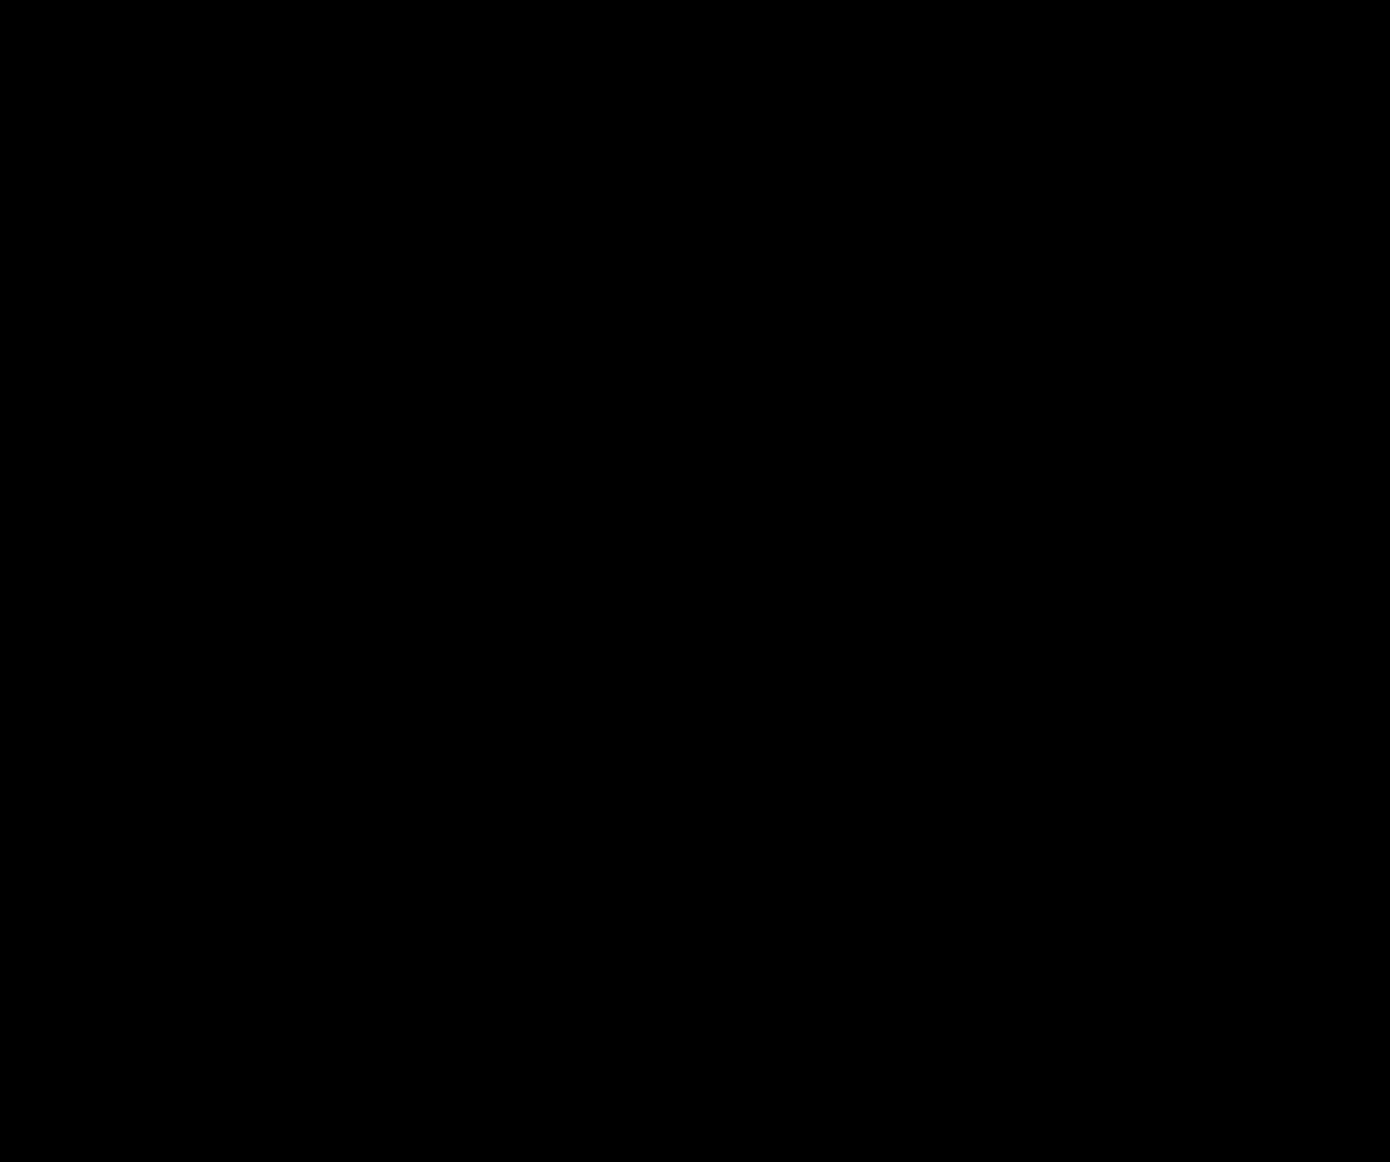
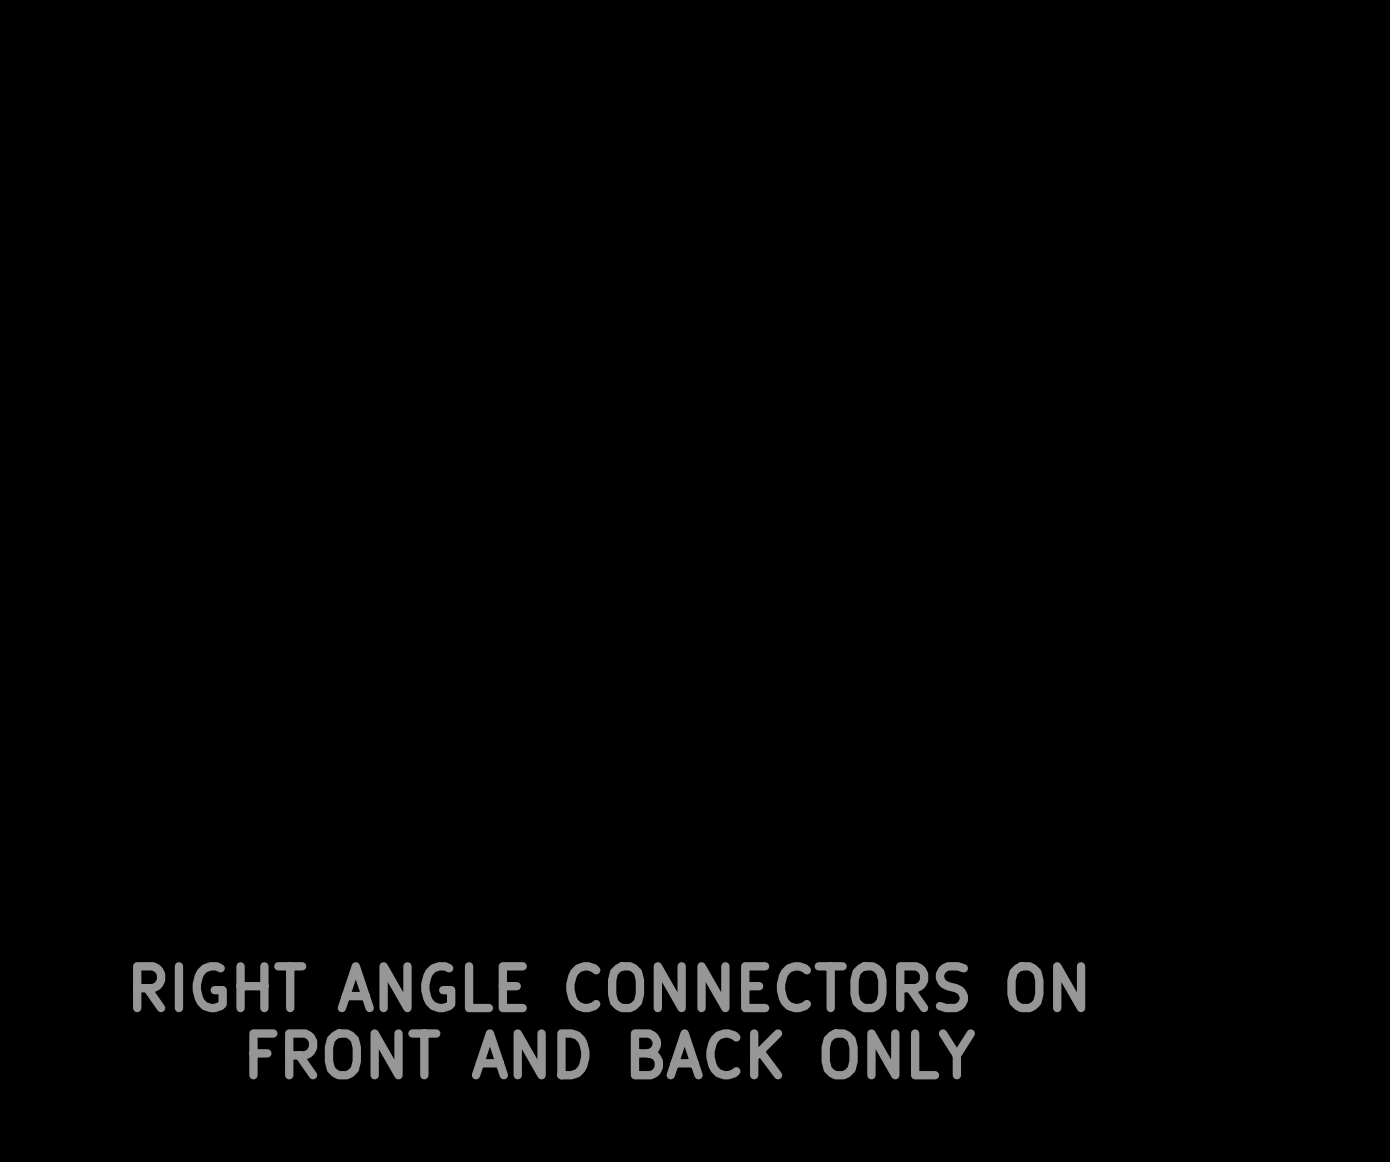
text: none -> RIGHT ANGLE CONNECTORS ON (609, 987)
text: none -> FRONT AND BACK ONLY (612, 1054)

